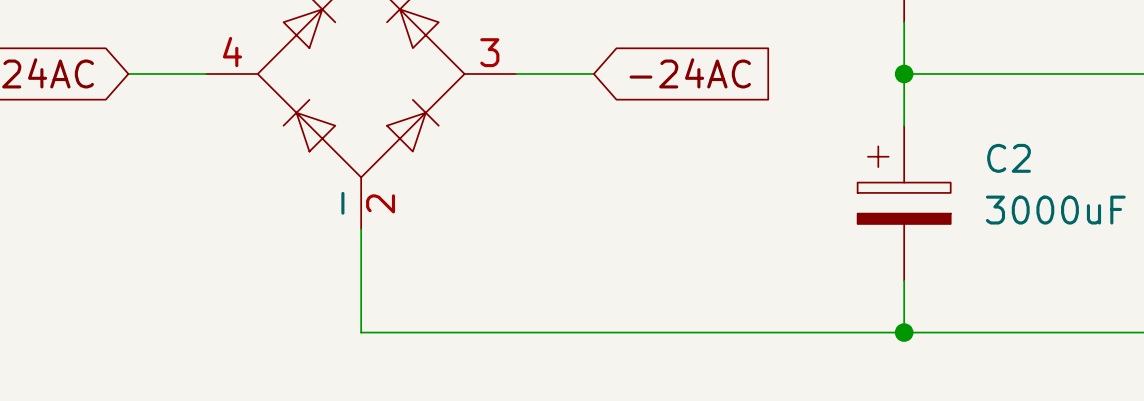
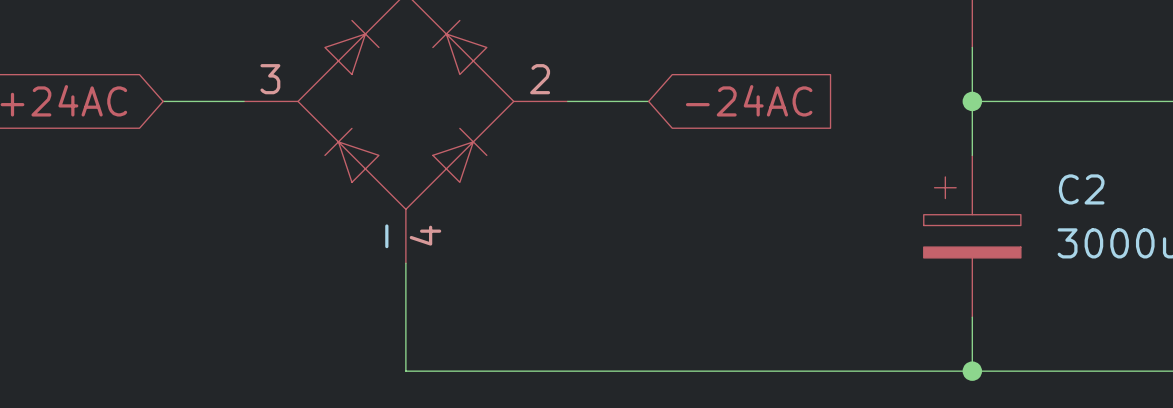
part pin number: 4 (232, 52) -> 3 (270, 79)
part pin number: 3 (489, 52) -> 2 (540, 79)
part pin number: 2 (380, 203) -> 4 (425, 235)

